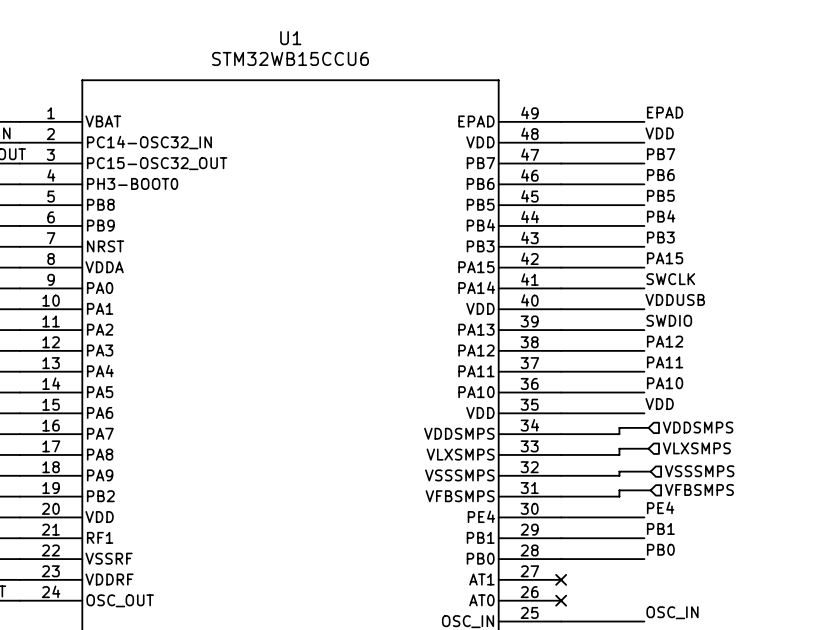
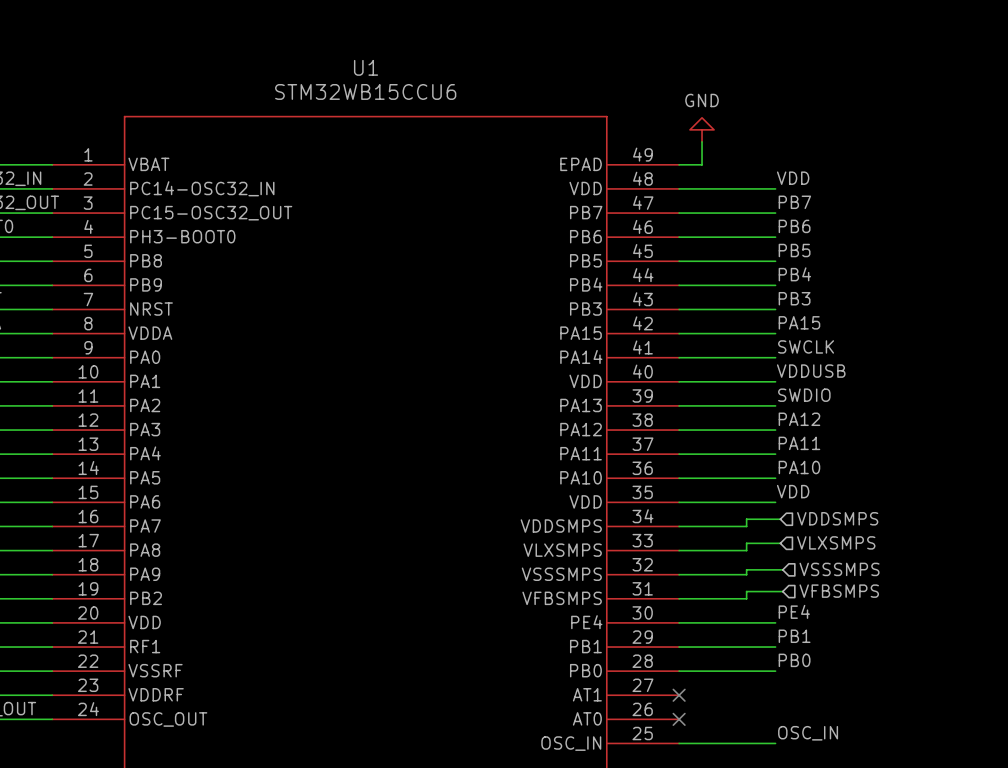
power symbol: none -> GND (702, 129)
label: EPAD (665, 112) -> none
wire: (580, 121) (644, 121) -> (702, 164) (702, 141)

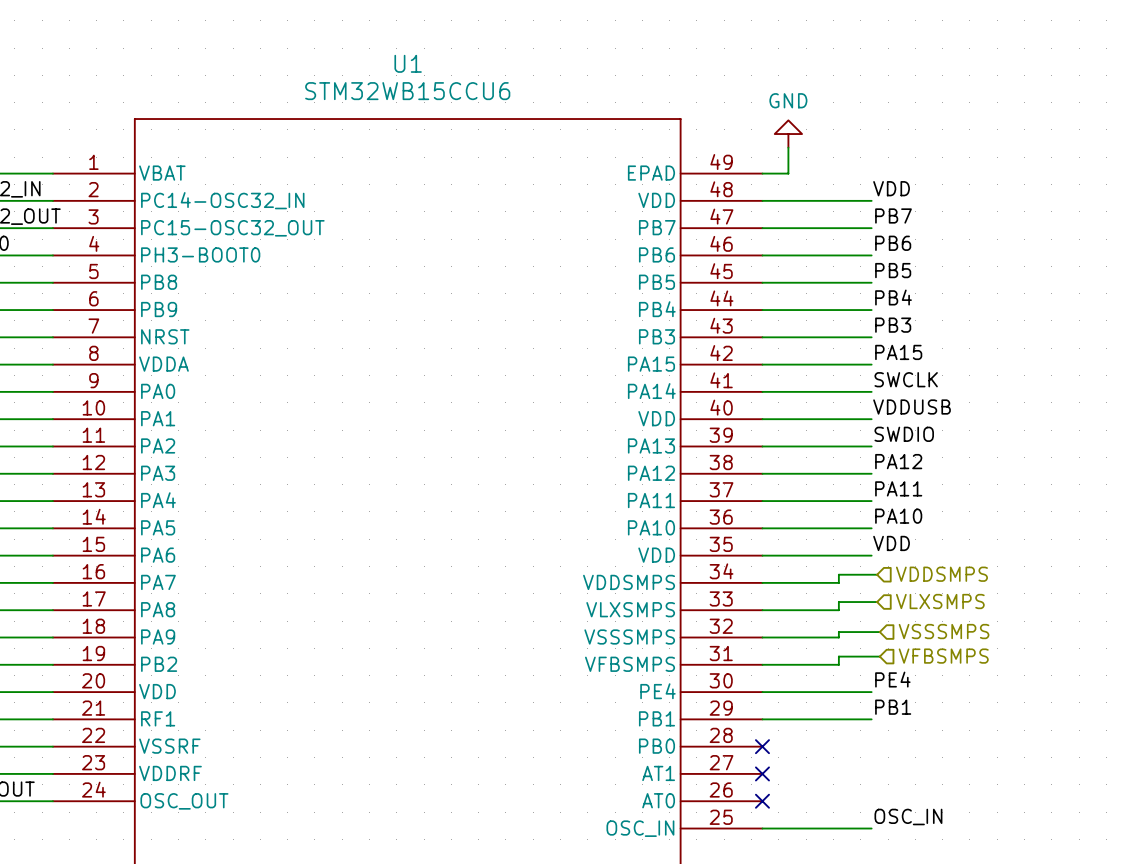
label: PB0 (794, 660) -> none
wire: (679, 671) (775, 671) -> none
no-connect mark: none -> (762, 746)

